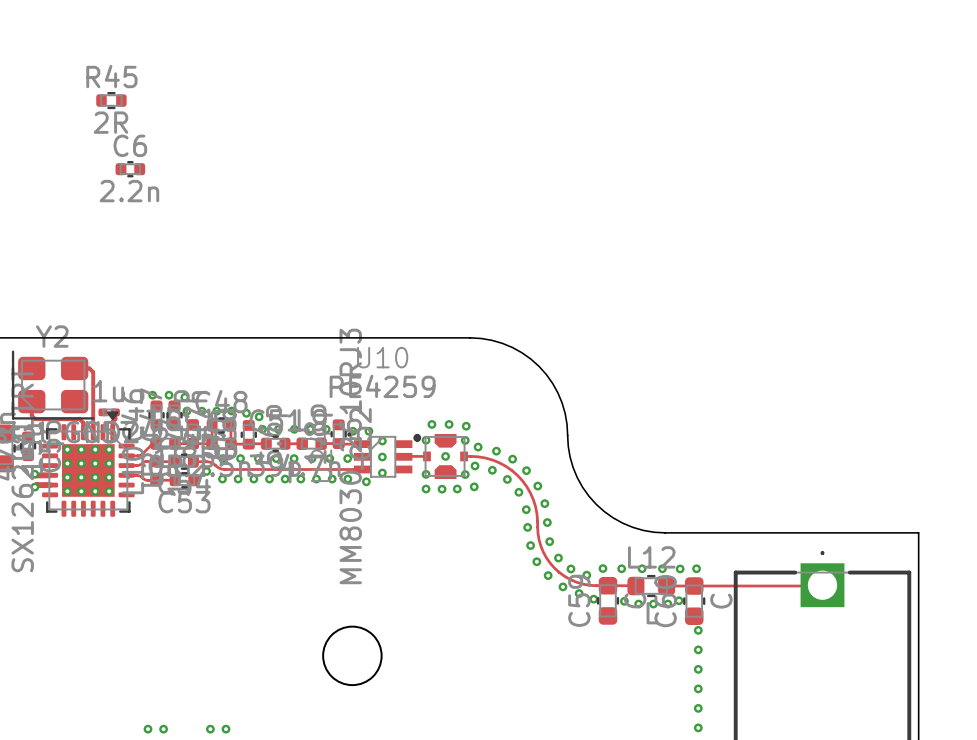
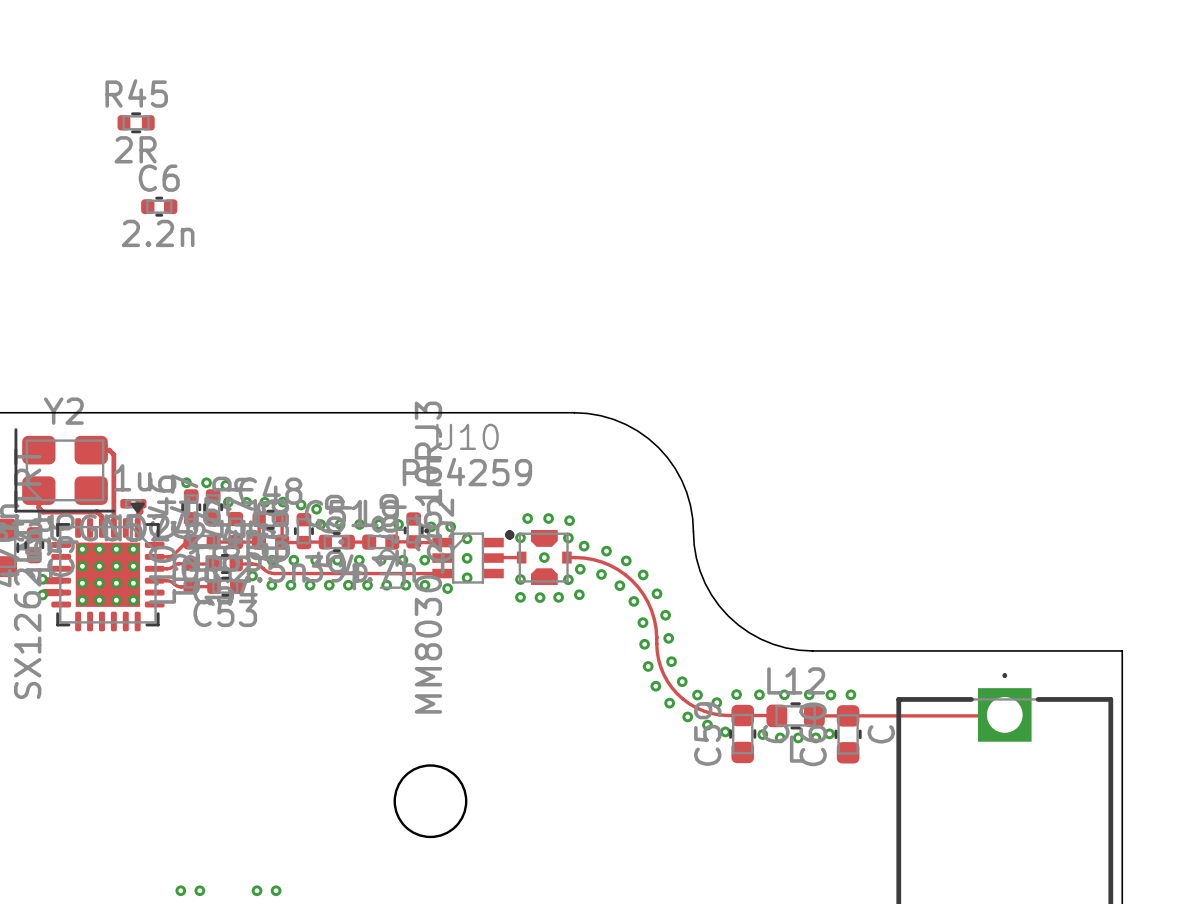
via: (698, 630) -> none
via: (698, 649) -> none
via: (698, 669) -> none
via: (698, 688) -> none
via: (698, 708) -> none
via: (698, 727) -> none

